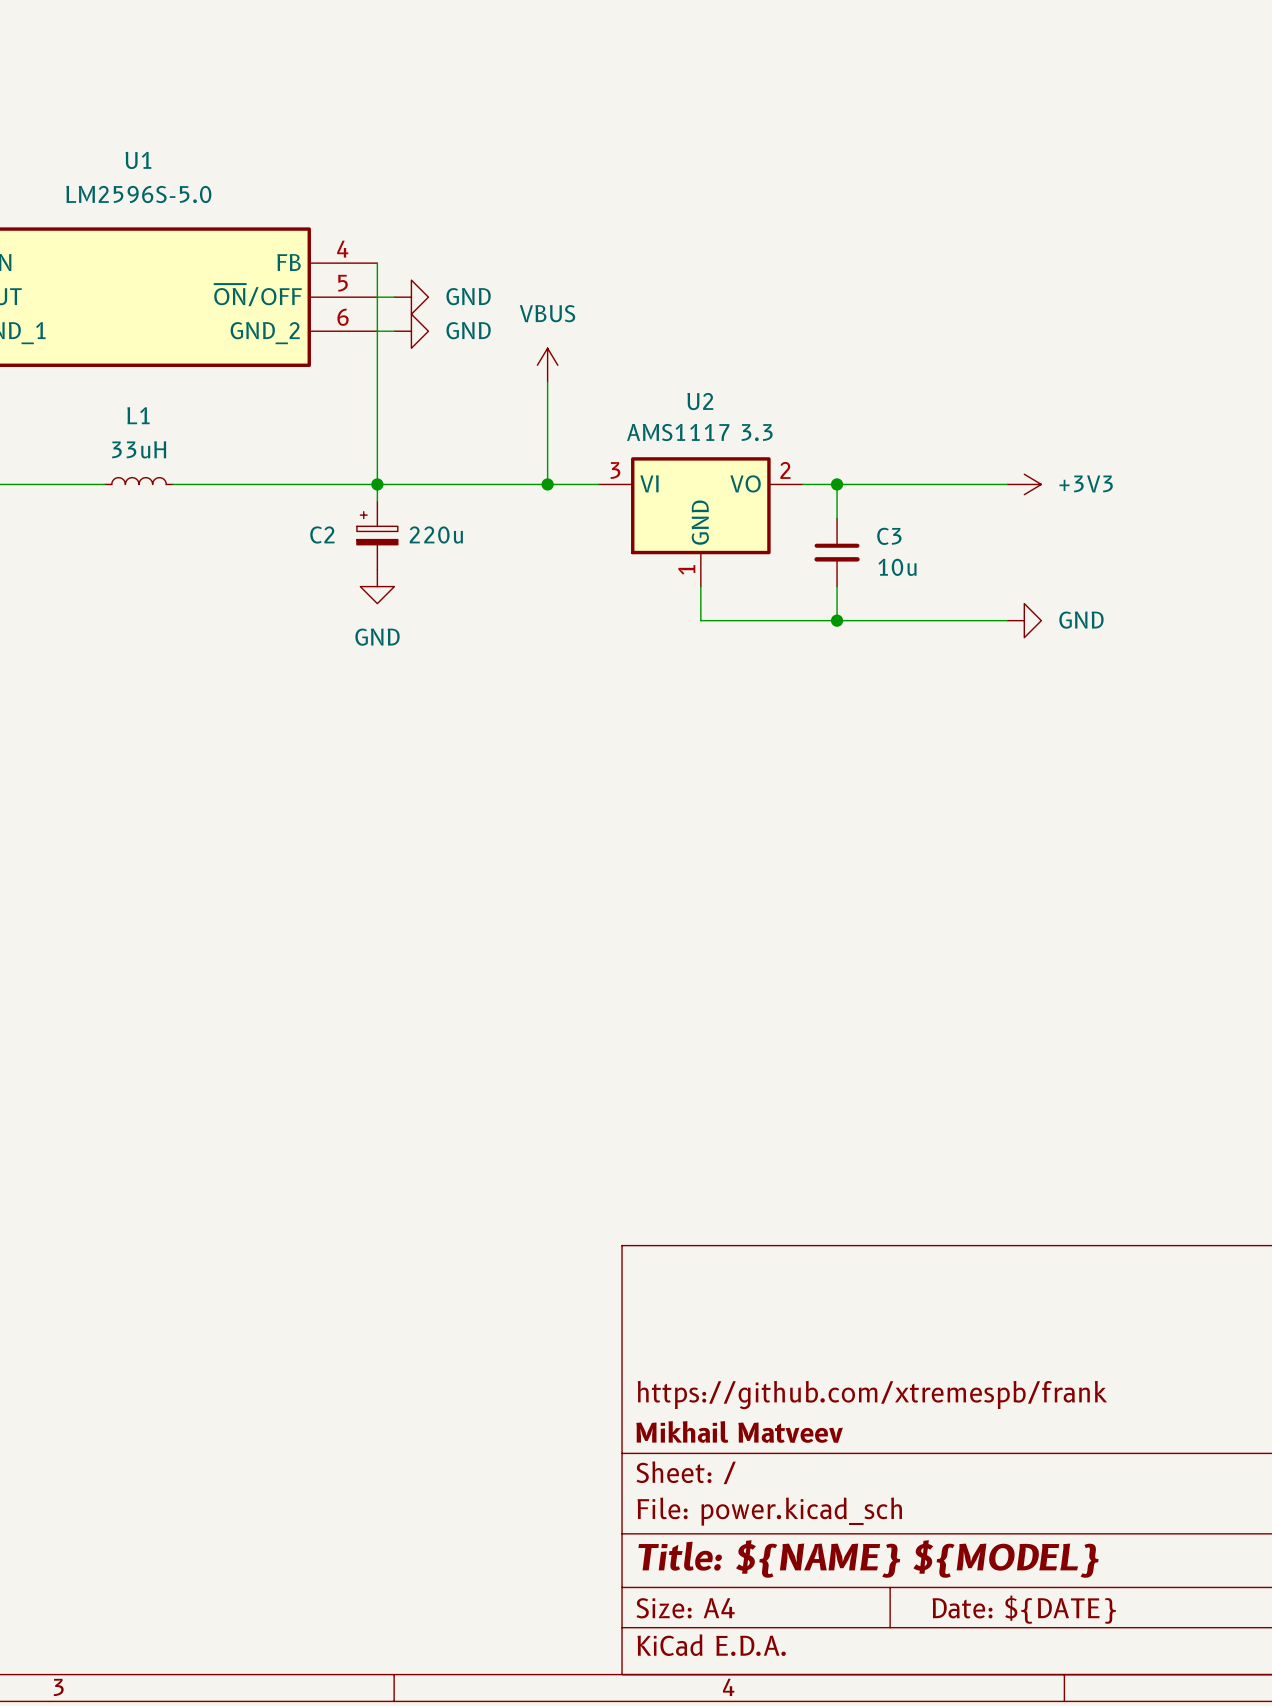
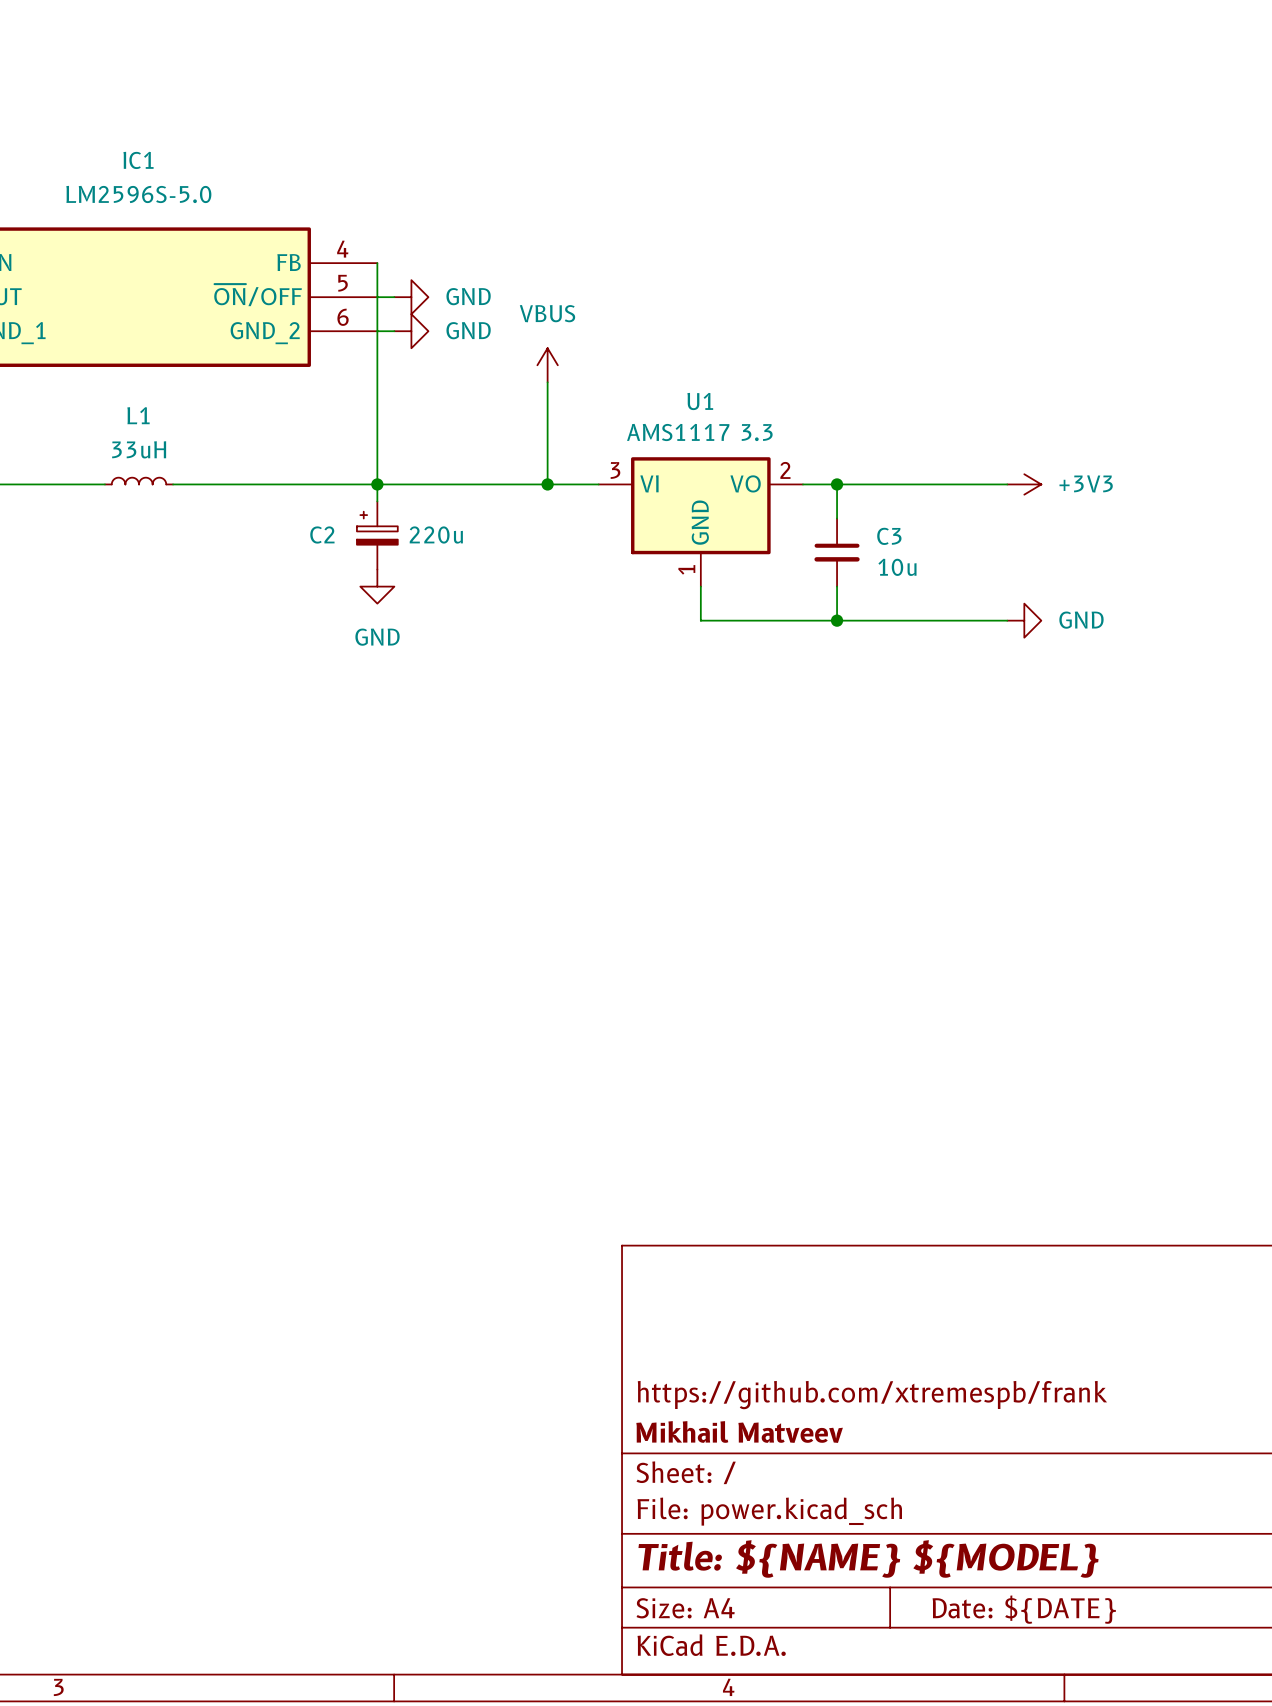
U1 name: U1 (138, 160) -> IC1 (138, 160)
U2 name: U2 (700, 401) -> U1 (700, 401)

